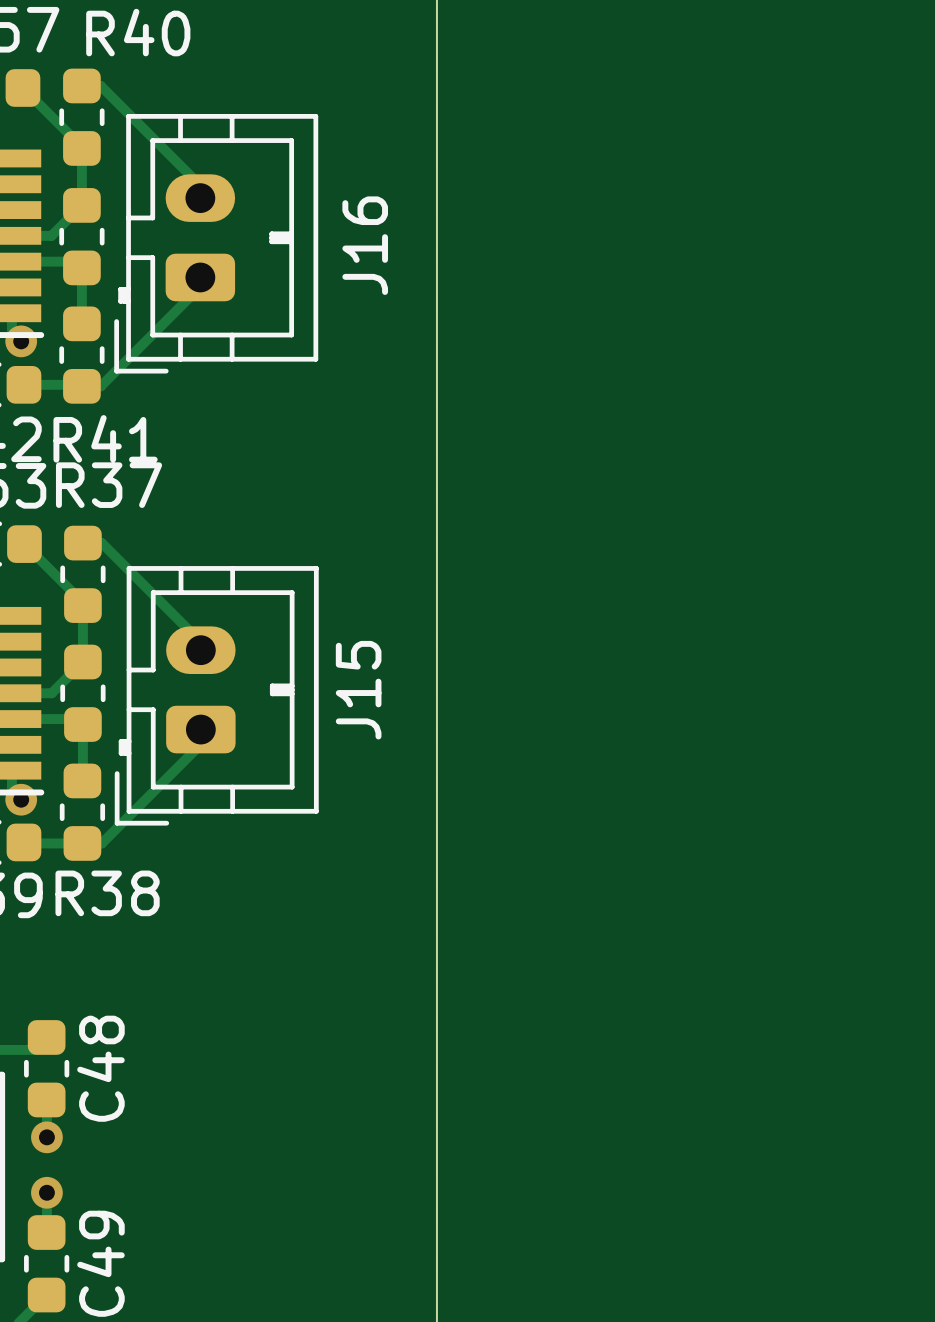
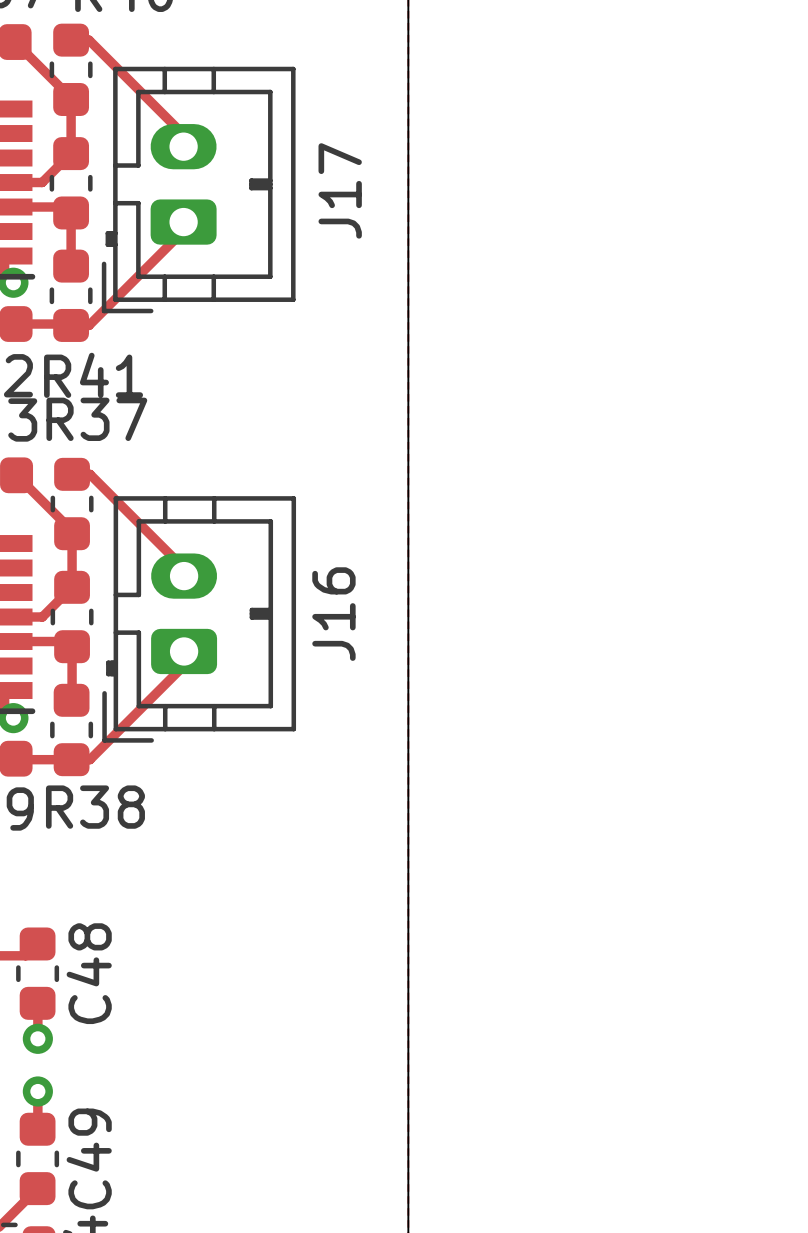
J16 name: J16 (365, 245) -> J17 (340, 190)
J15 name: J15 (358, 690) -> J16 (333, 614)

